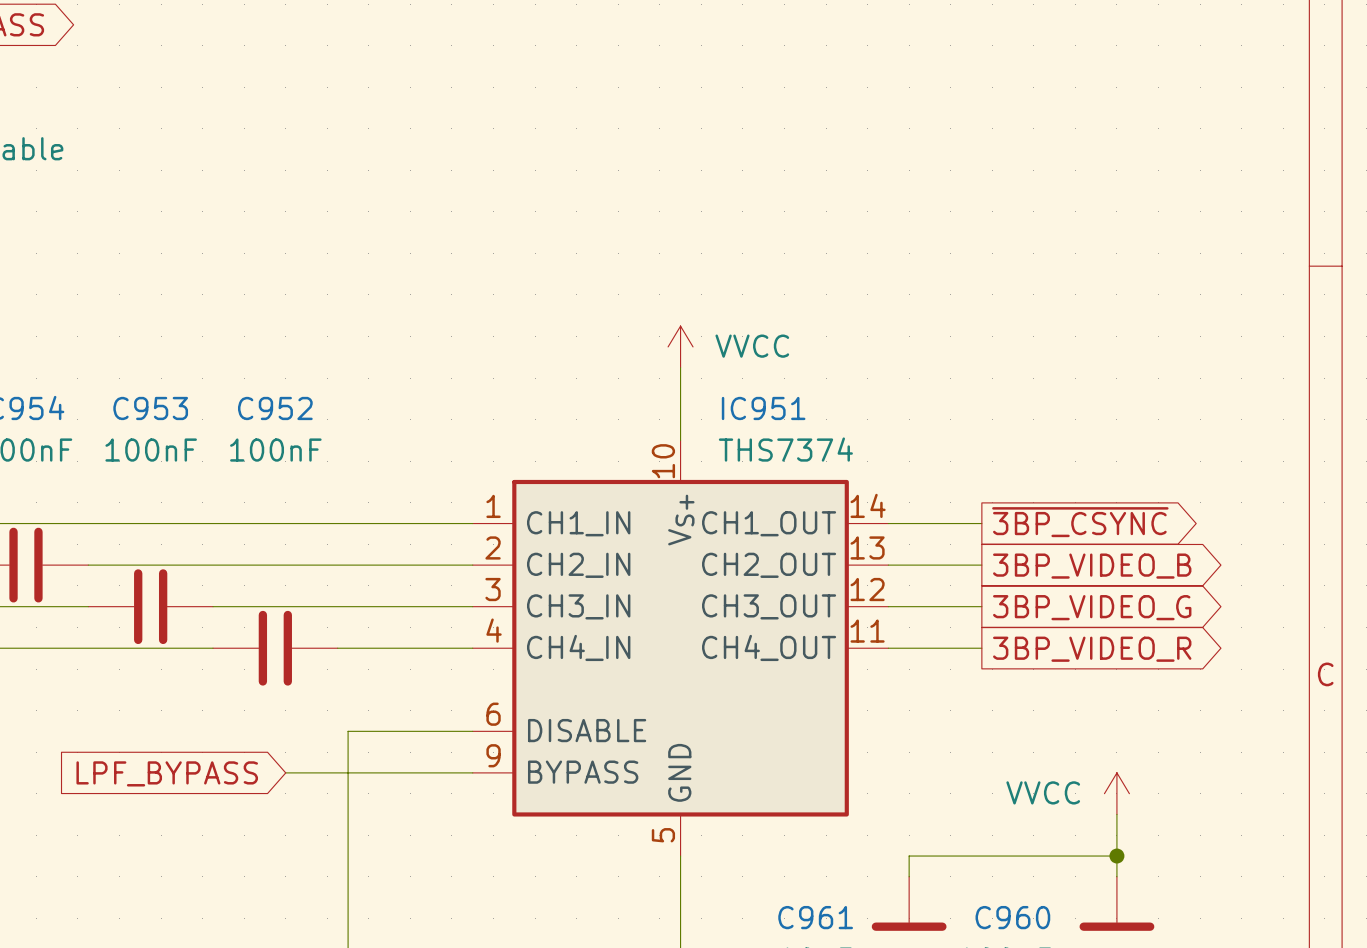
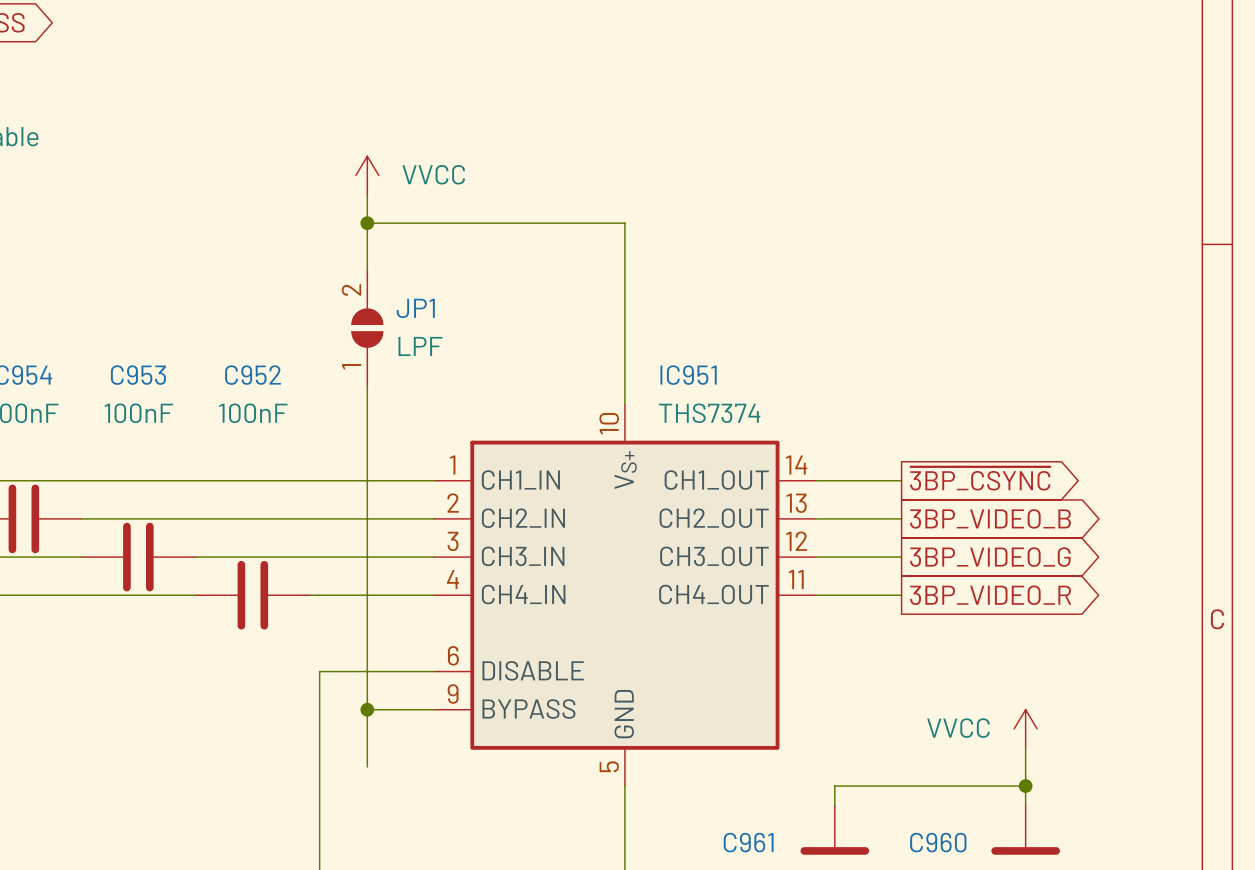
wire: none -> (367, 194) (367, 270)
wire: none -> (367, 223) (624, 223) (624, 337)
junction: none -> (367, 223)
power symbol position: VVCC (680, 346) -> VVCC (367, 175)
JP1: none -> LPF (367, 328)
wire: none -> (367, 385) (367, 766)
wire: (285, 772) (400, 772) -> none
junction: none -> (367, 709)
global label: LPF_BYPASS (167, 773) -> none

